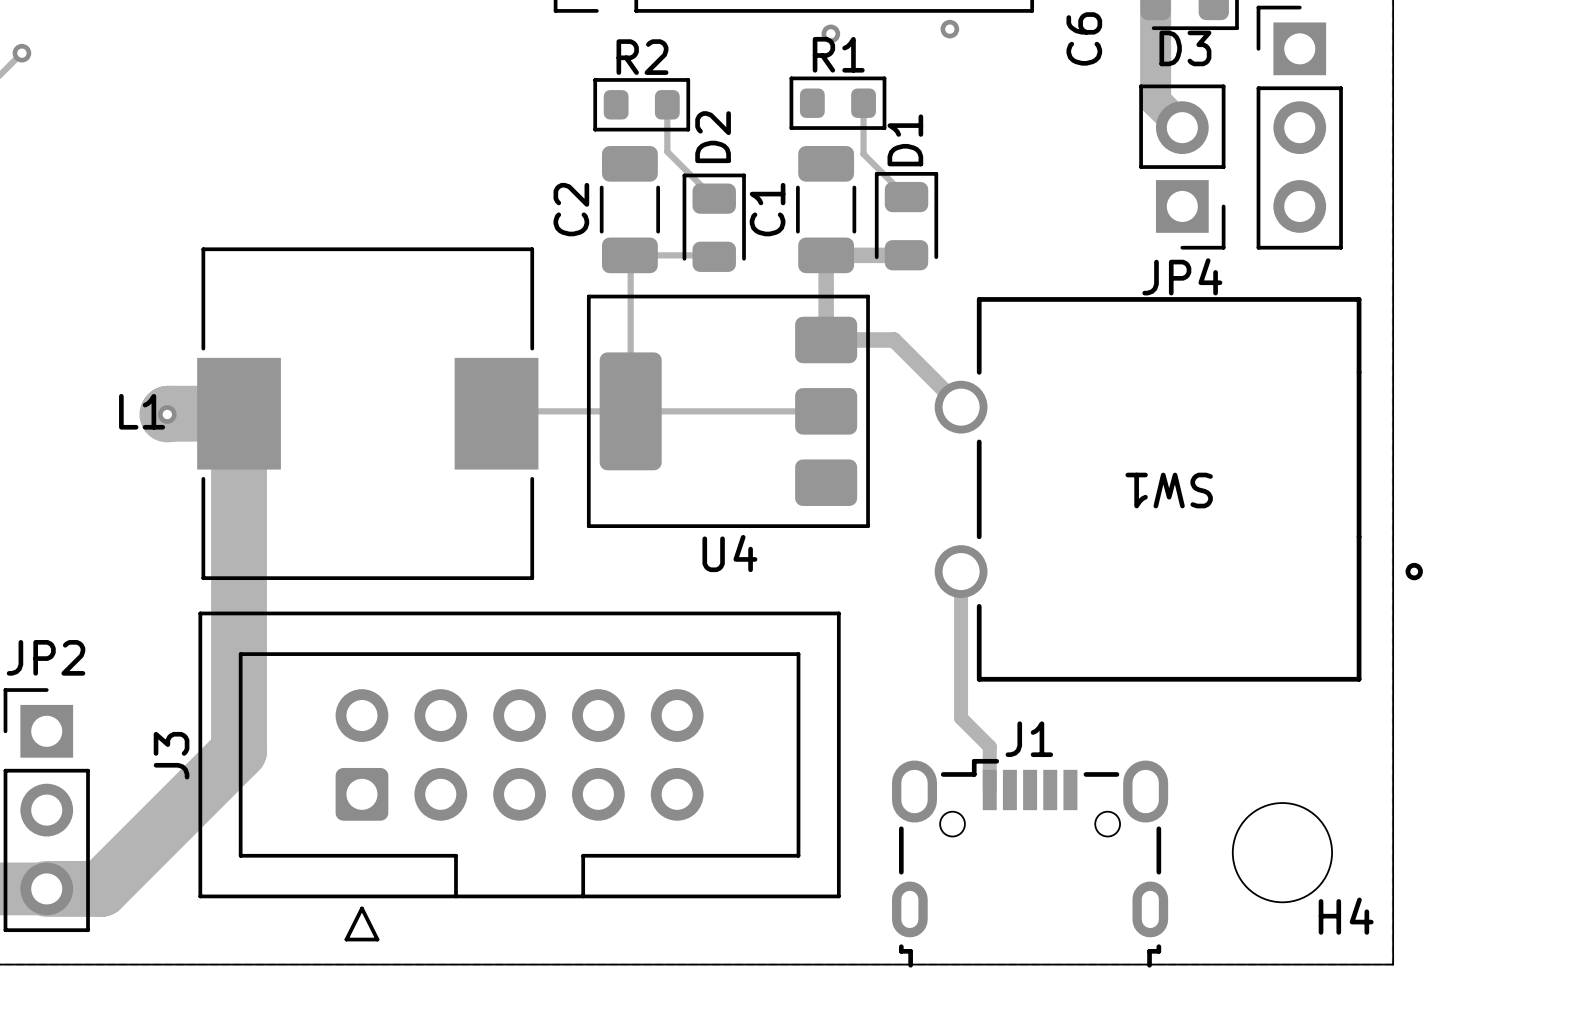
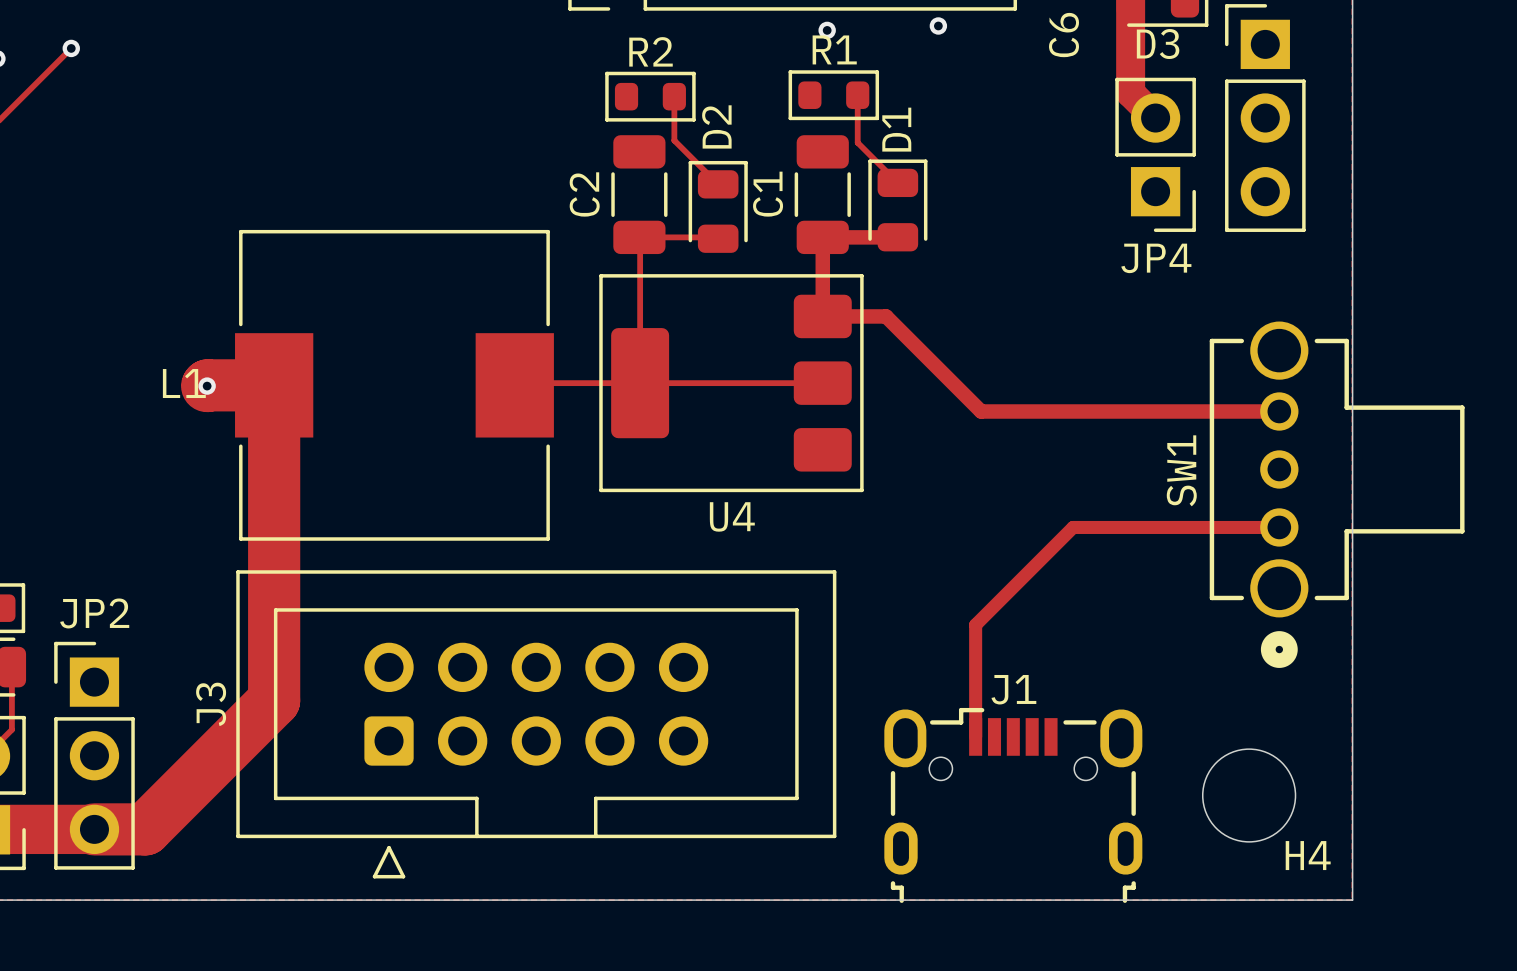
SW1 footprint: [934, 297, 1423, 682] -> [1209, 321, 1465, 668]
track: none -> (948, 379) (981, 411) (1279, 411)
SW1 name position: SW1 (1169, 490) -> SW1 (1181, 470)
track: (961, 571) (961, 718) (989, 746) -> (1279, 527) (1073, 527) (975, 624) (975, 696)

